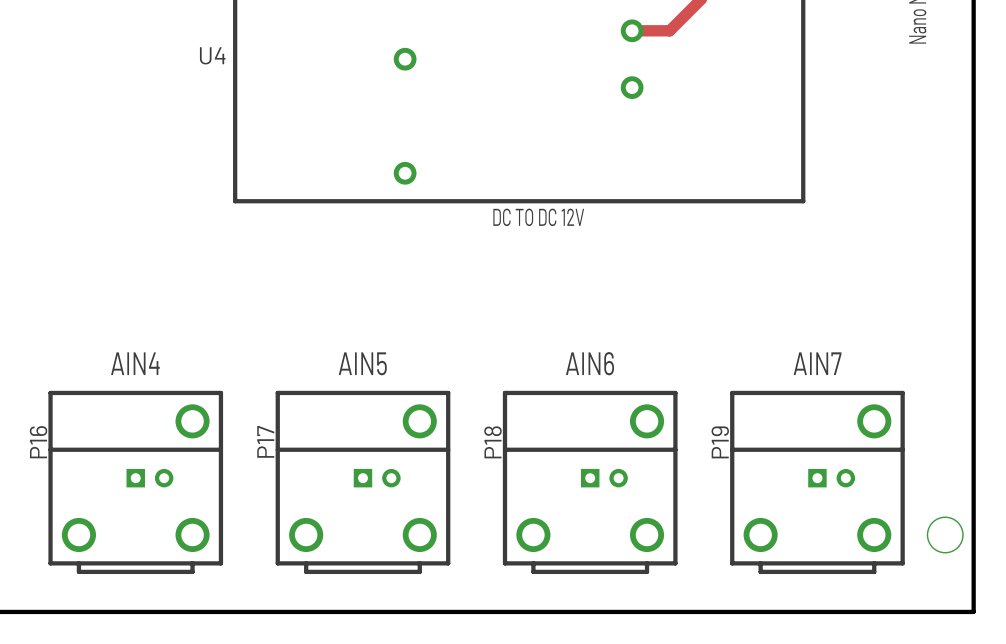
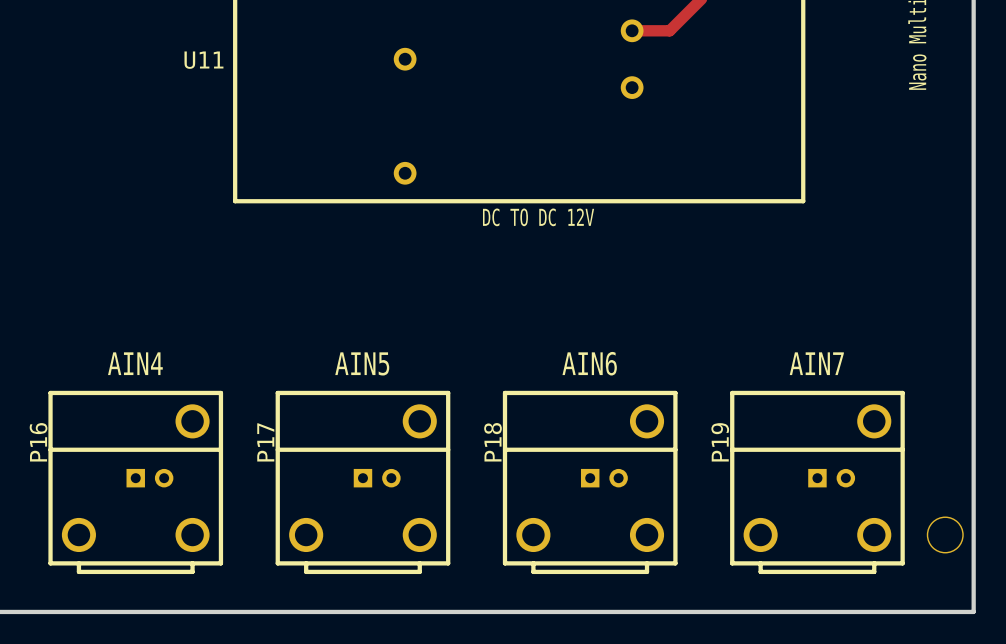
U4 name: U4 (212, 55) -> U11 (203, 60)

